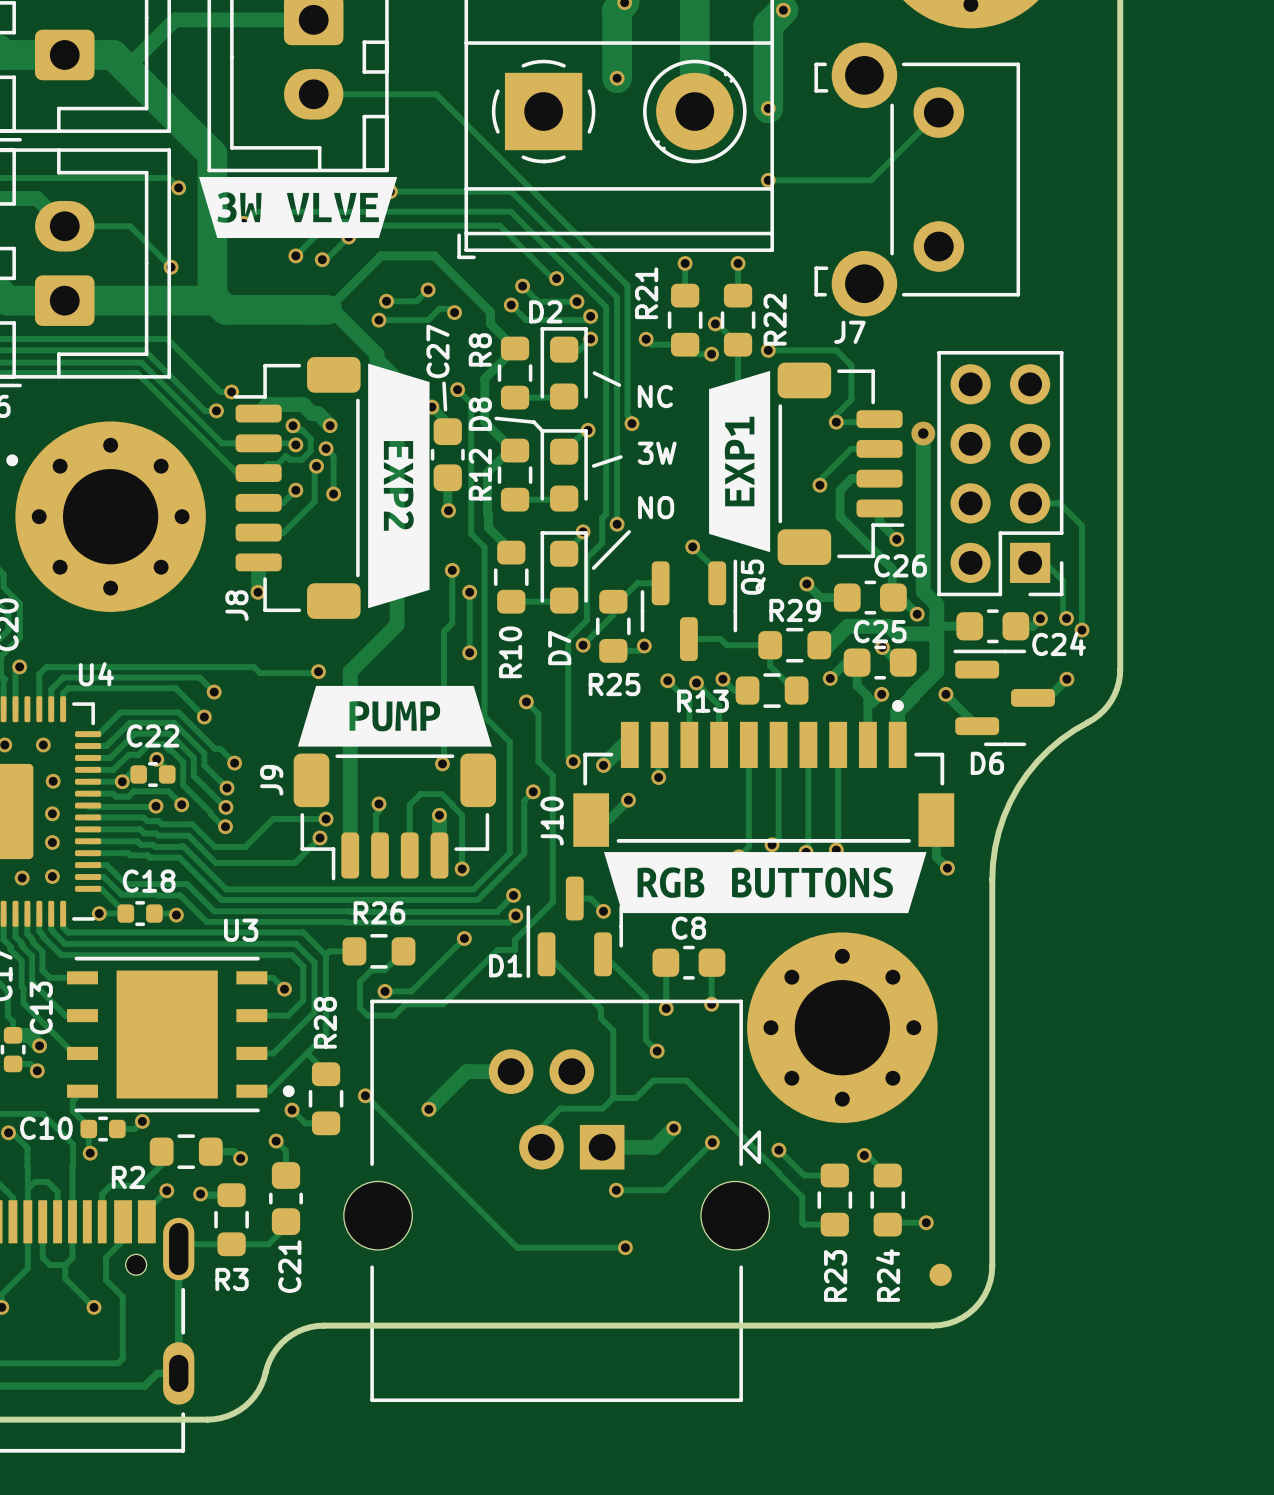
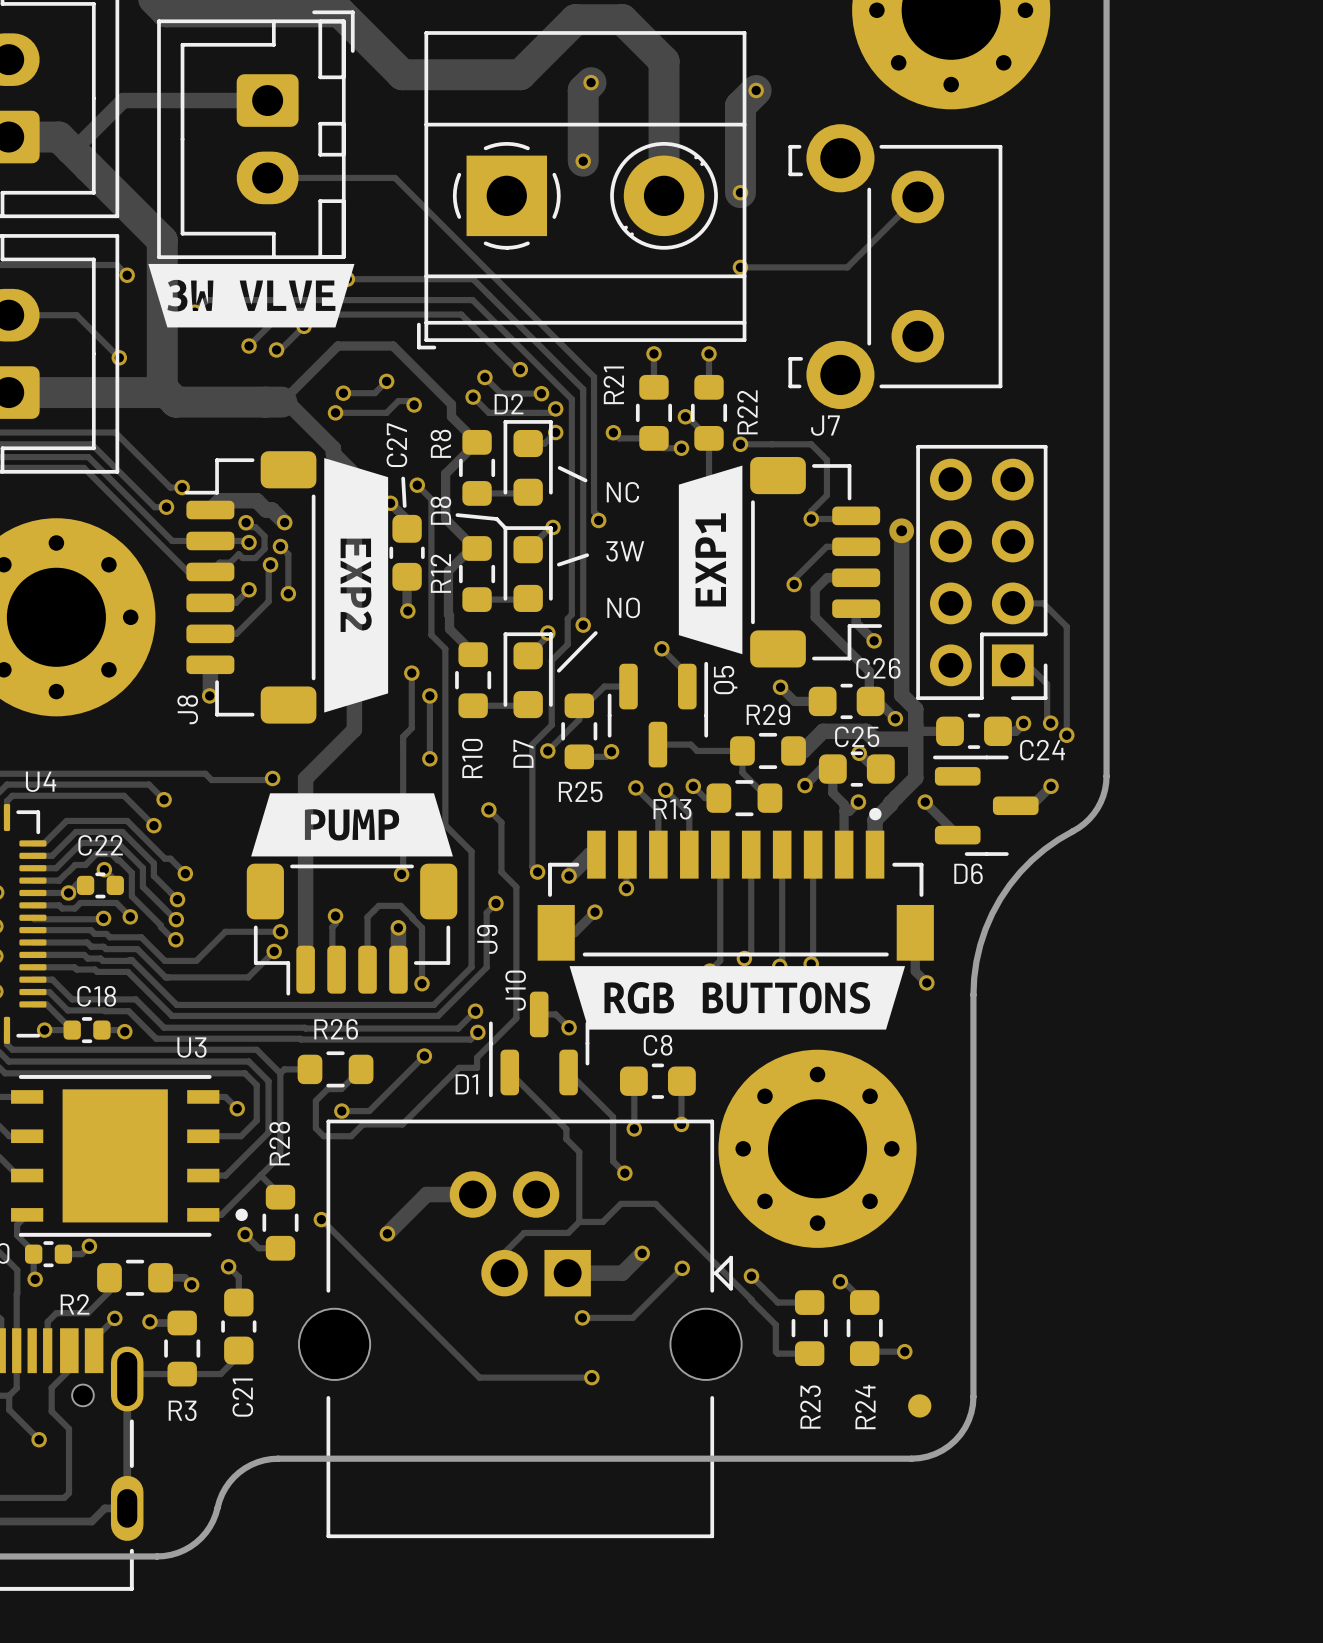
J9 name position: J9 (271, 780) -> J9 (487, 939)
J10 name position: J10 (552, 821) -> J10 (515, 990)

